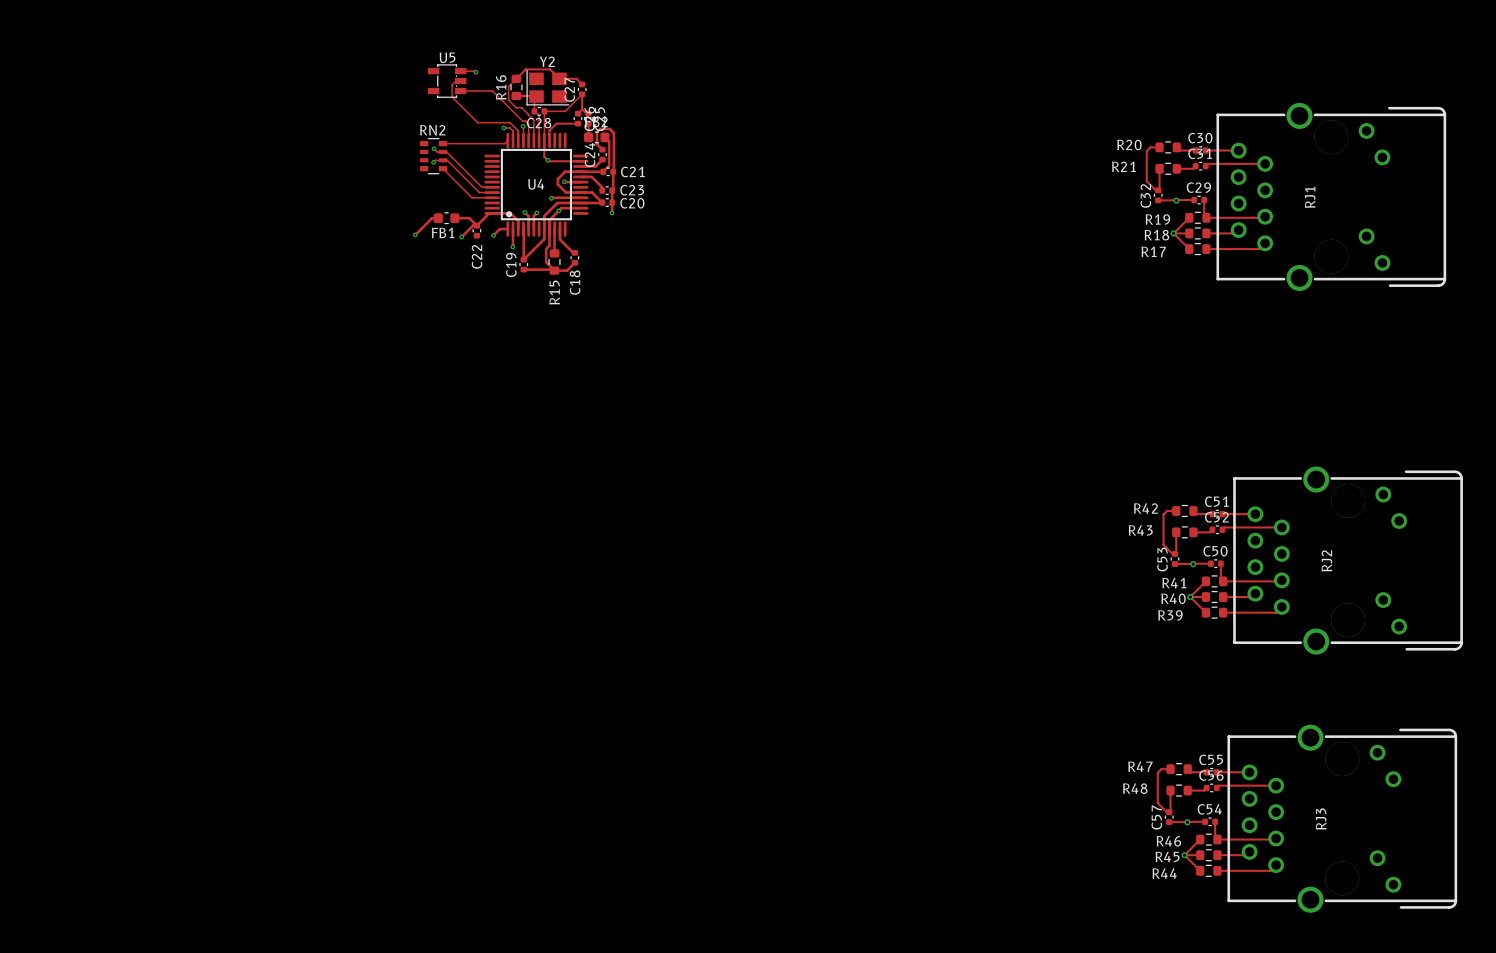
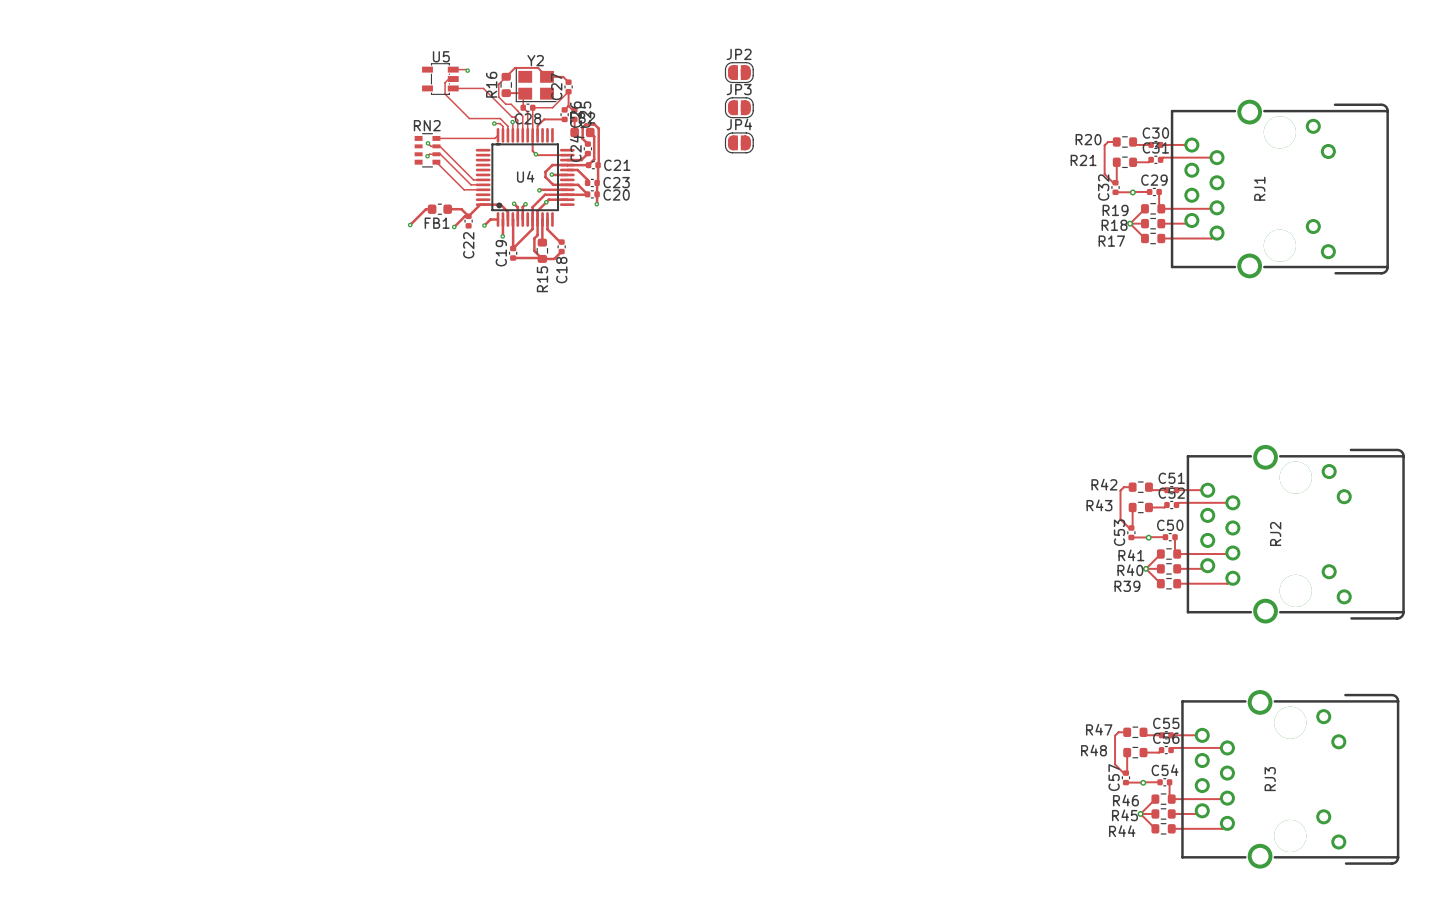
JP2: none -> (739, 72)
JP3: none -> (739, 107)
JP4: none -> (739, 142)

